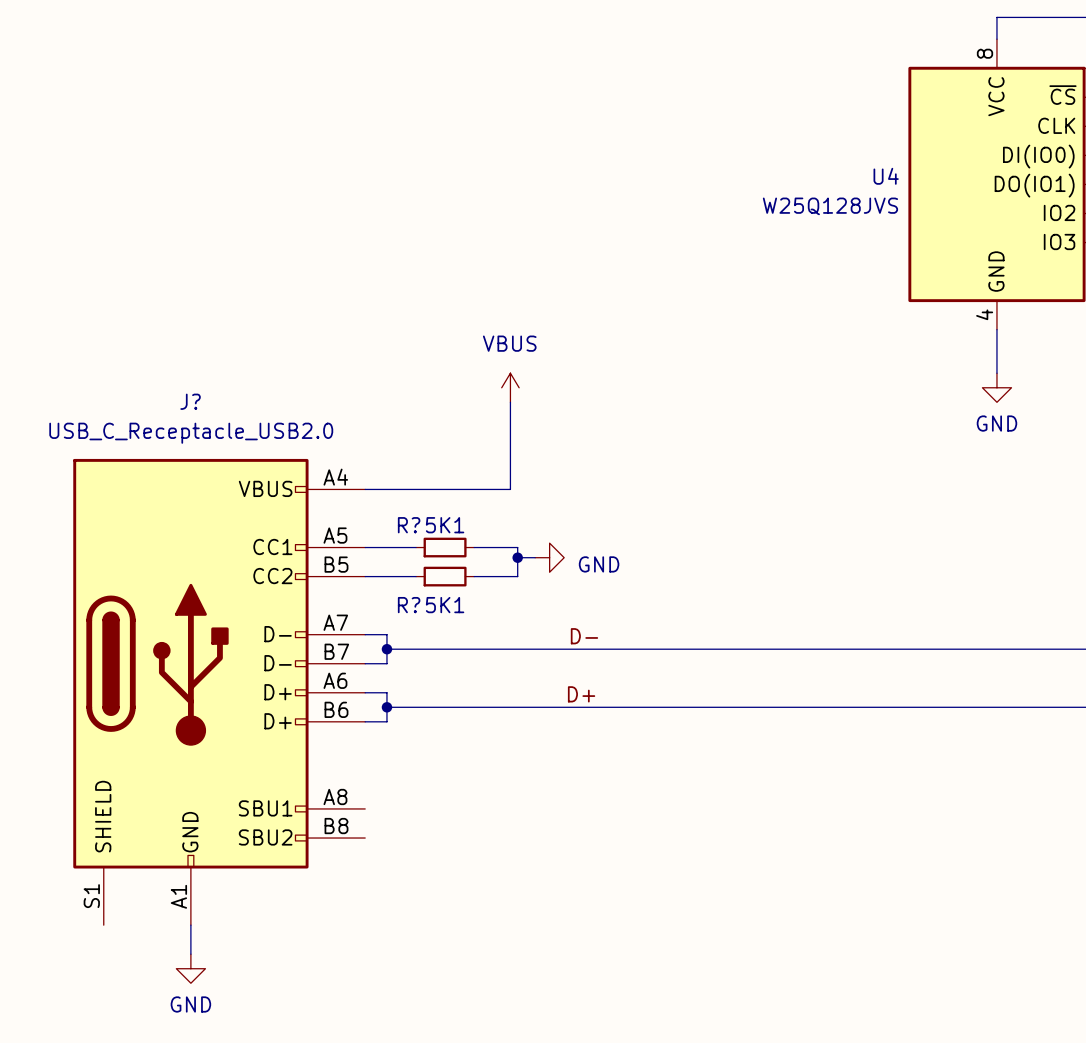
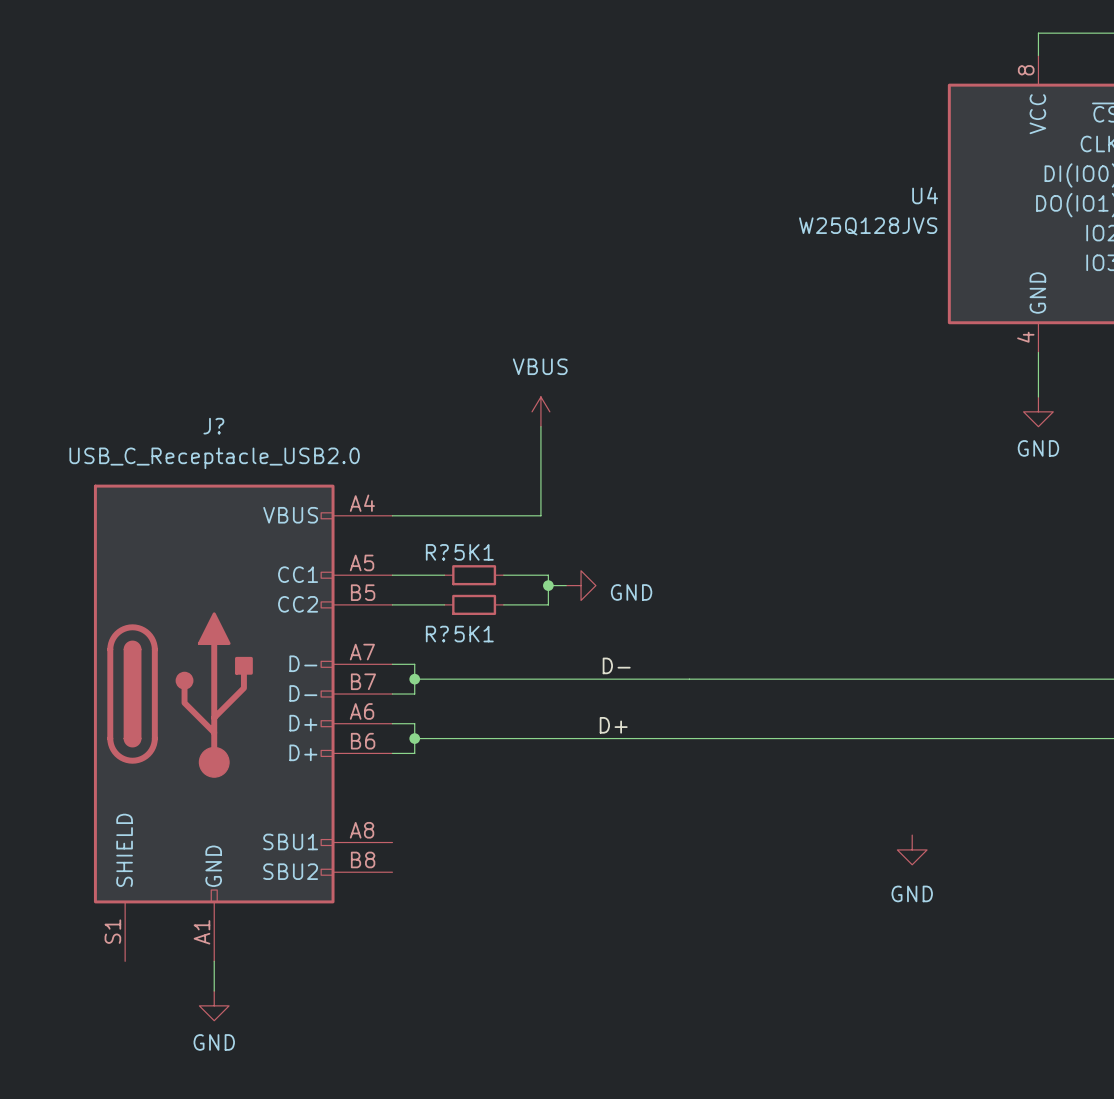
power symbol: none -> GND (912, 849)

